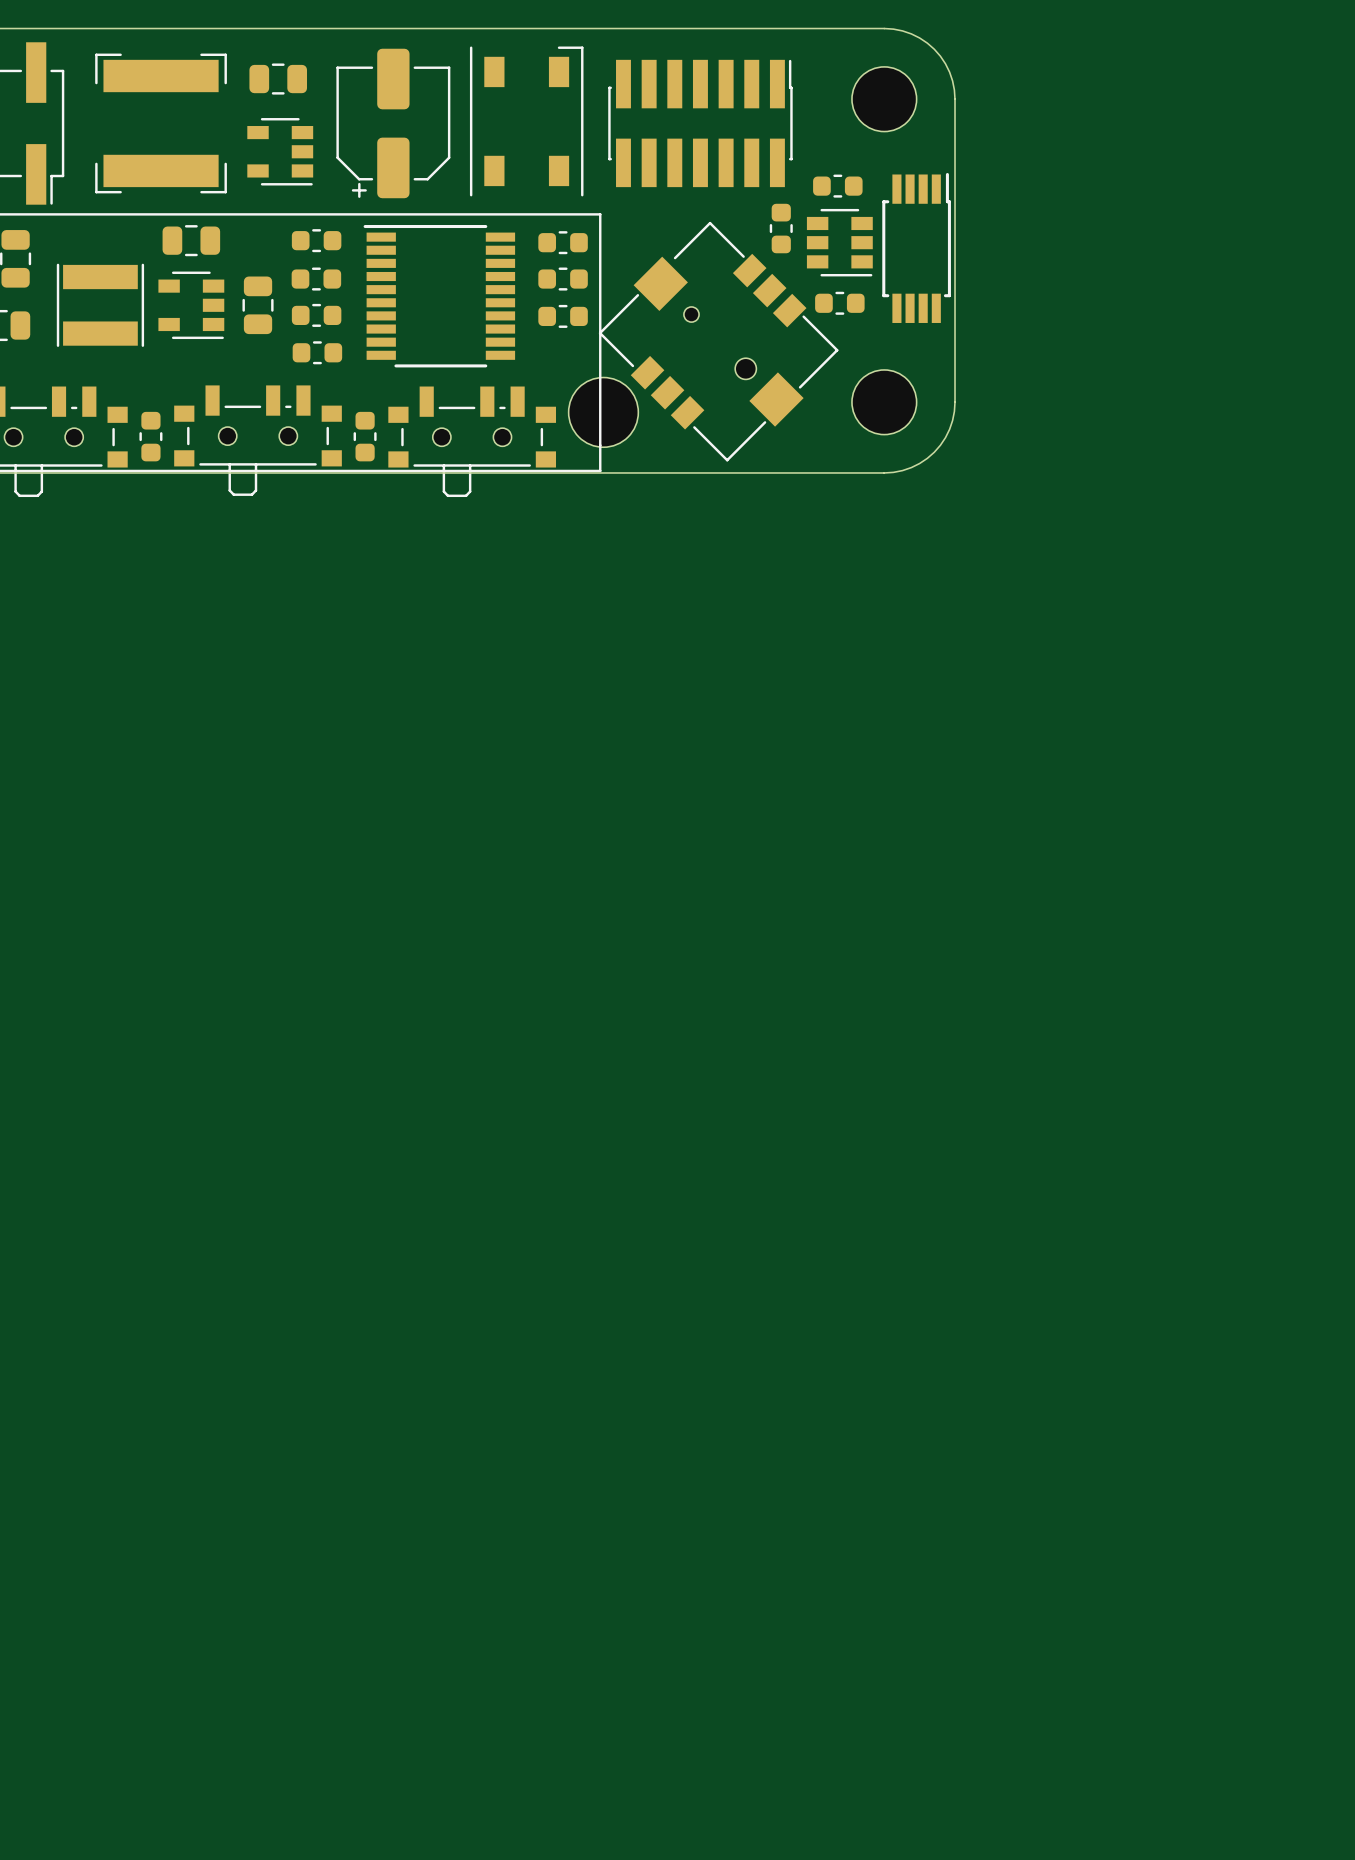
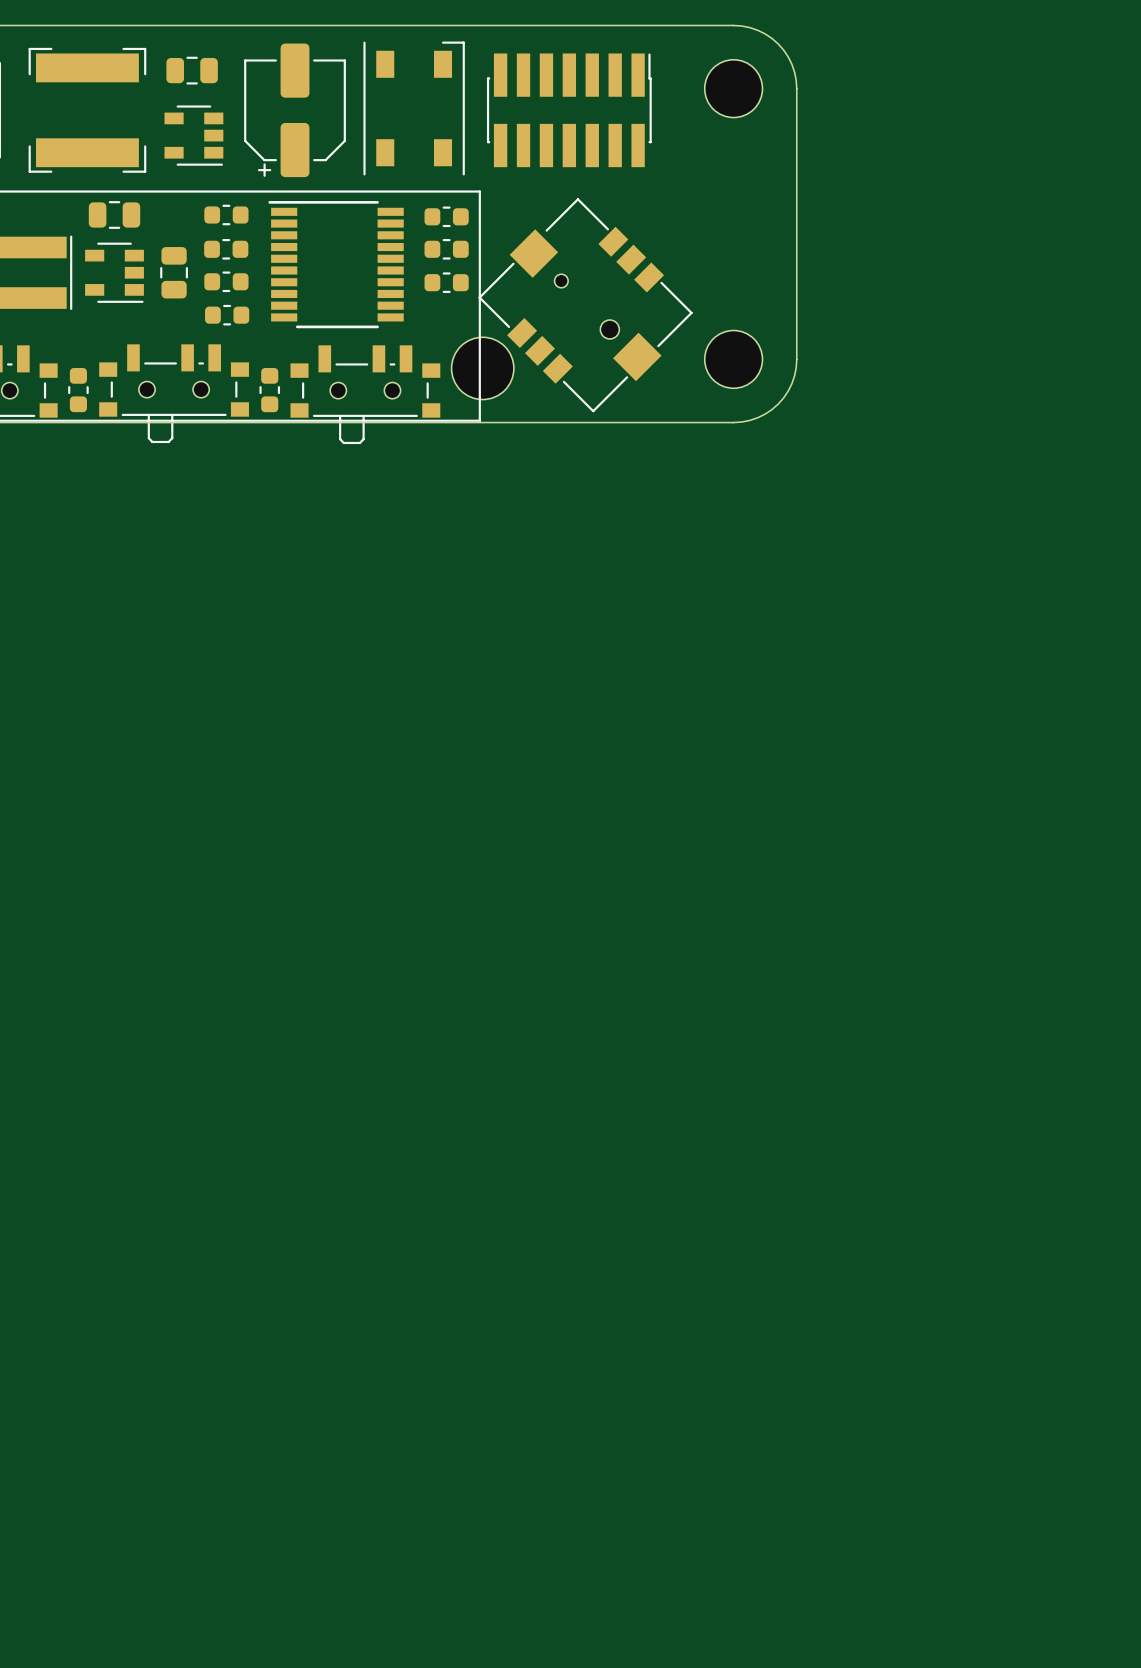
part: (837, 186) -> none
part: (781, 228) -> none
part: (839, 242) -> none
part: (916, 247) -> none
part: (839, 303) -> none

